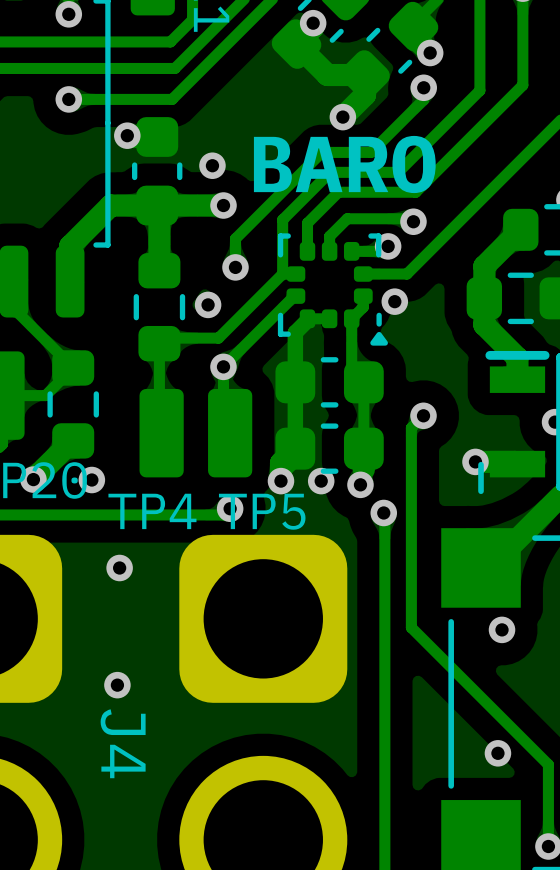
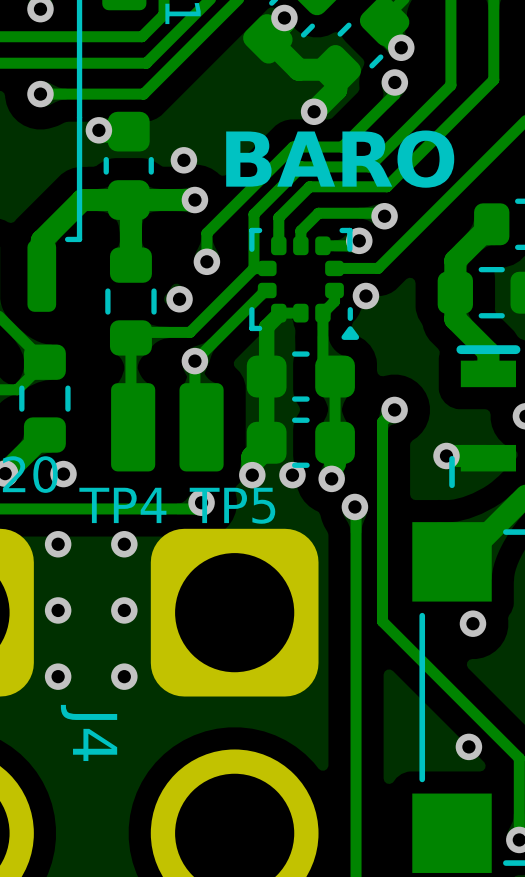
via: none -> (58, 544)
via: none -> (124, 544)
via: (119, 568) -> none
via: none -> (58, 610)
via: none -> (124, 610)
via: none -> (58, 676)
via: none -> (124, 676)
via: (117, 685) -> none

